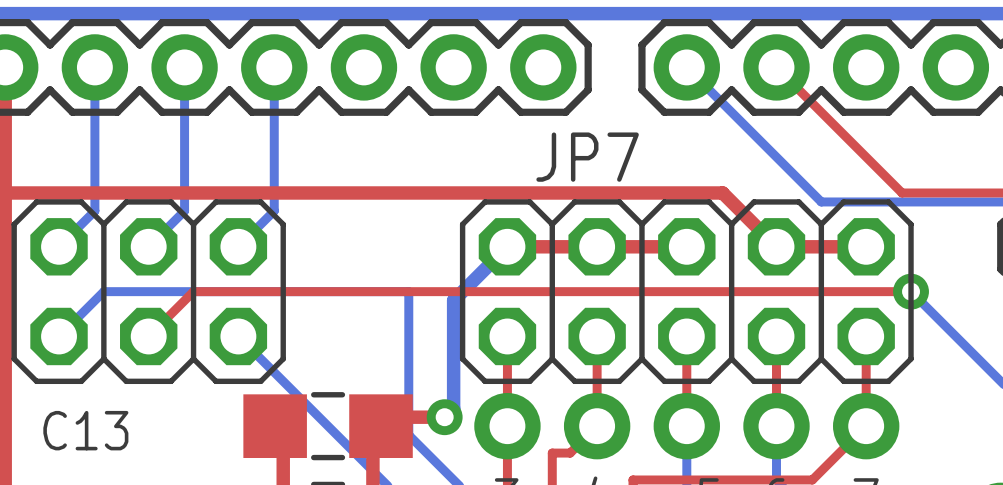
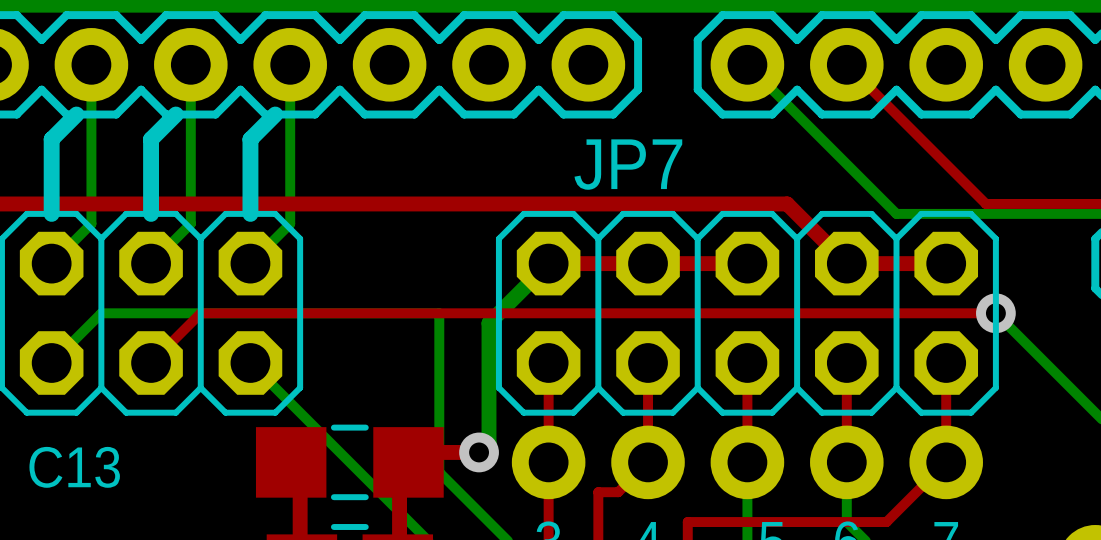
line: none -> (76, 114) (51, 139) (51, 213)
line: none -> (175, 114) (151, 139) (151, 213)
line: none -> (275, 114) (250, 139) (250, 213)

